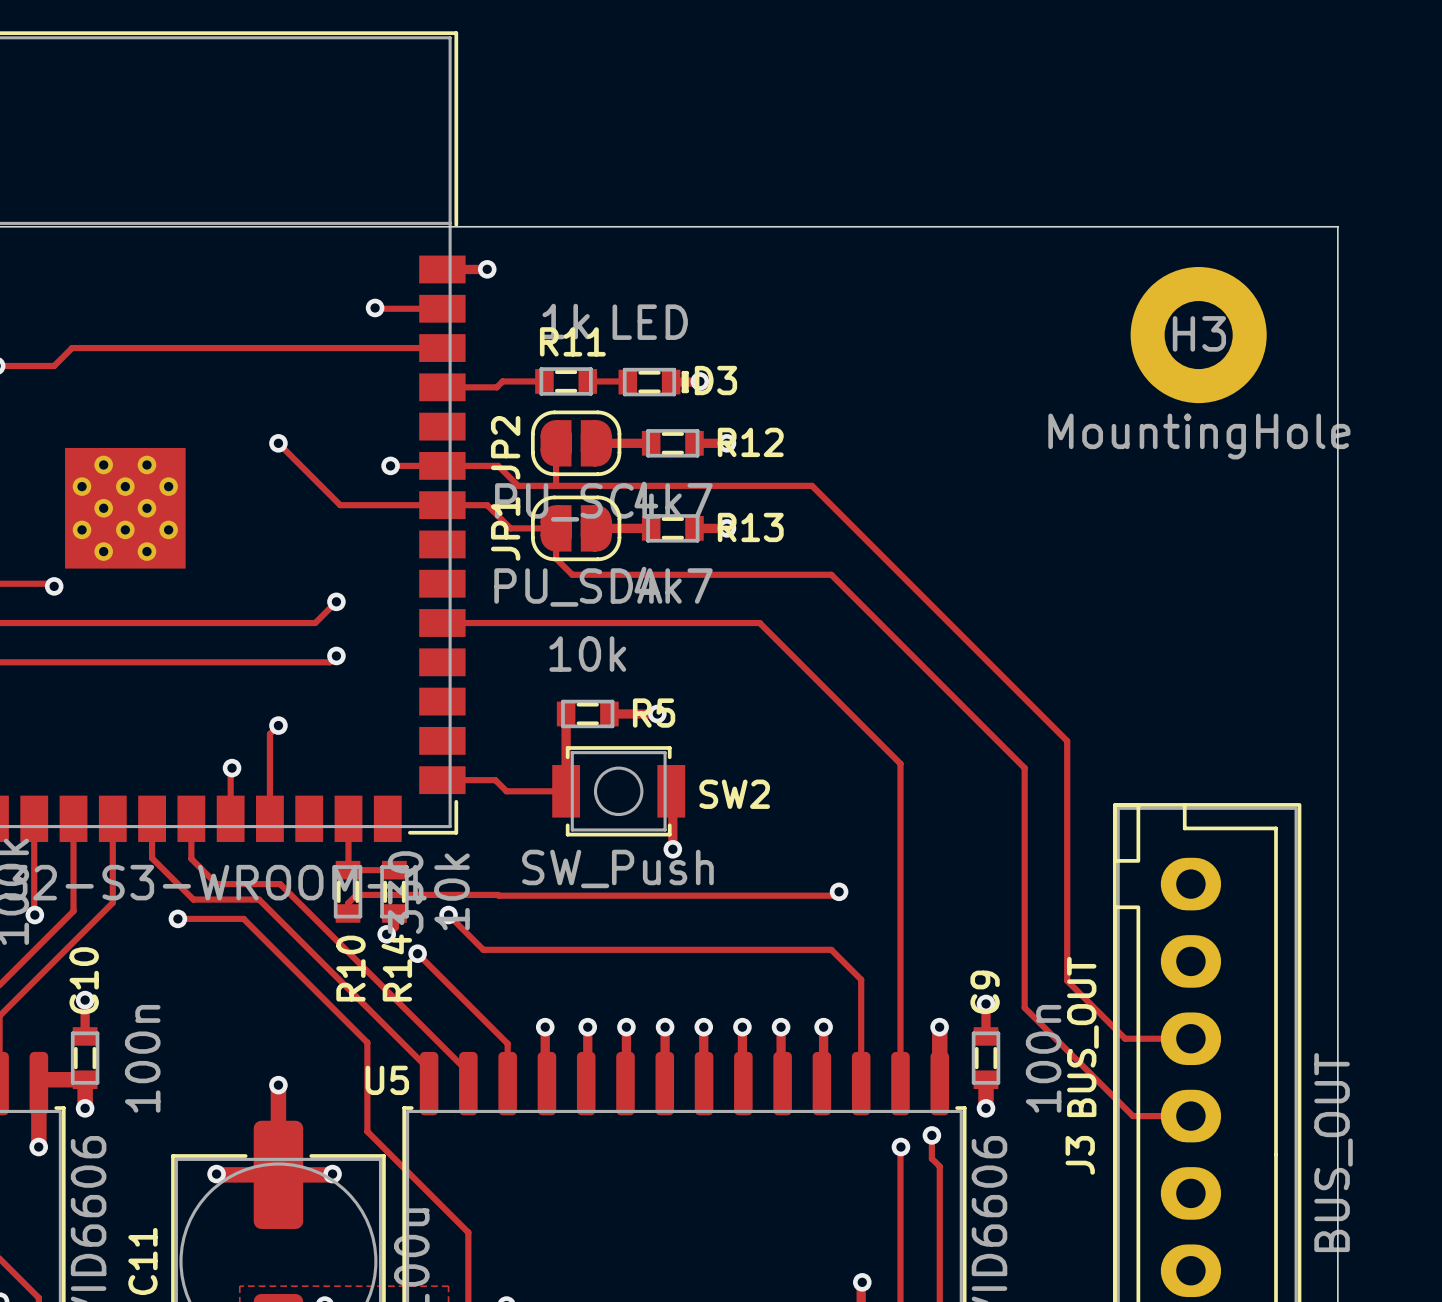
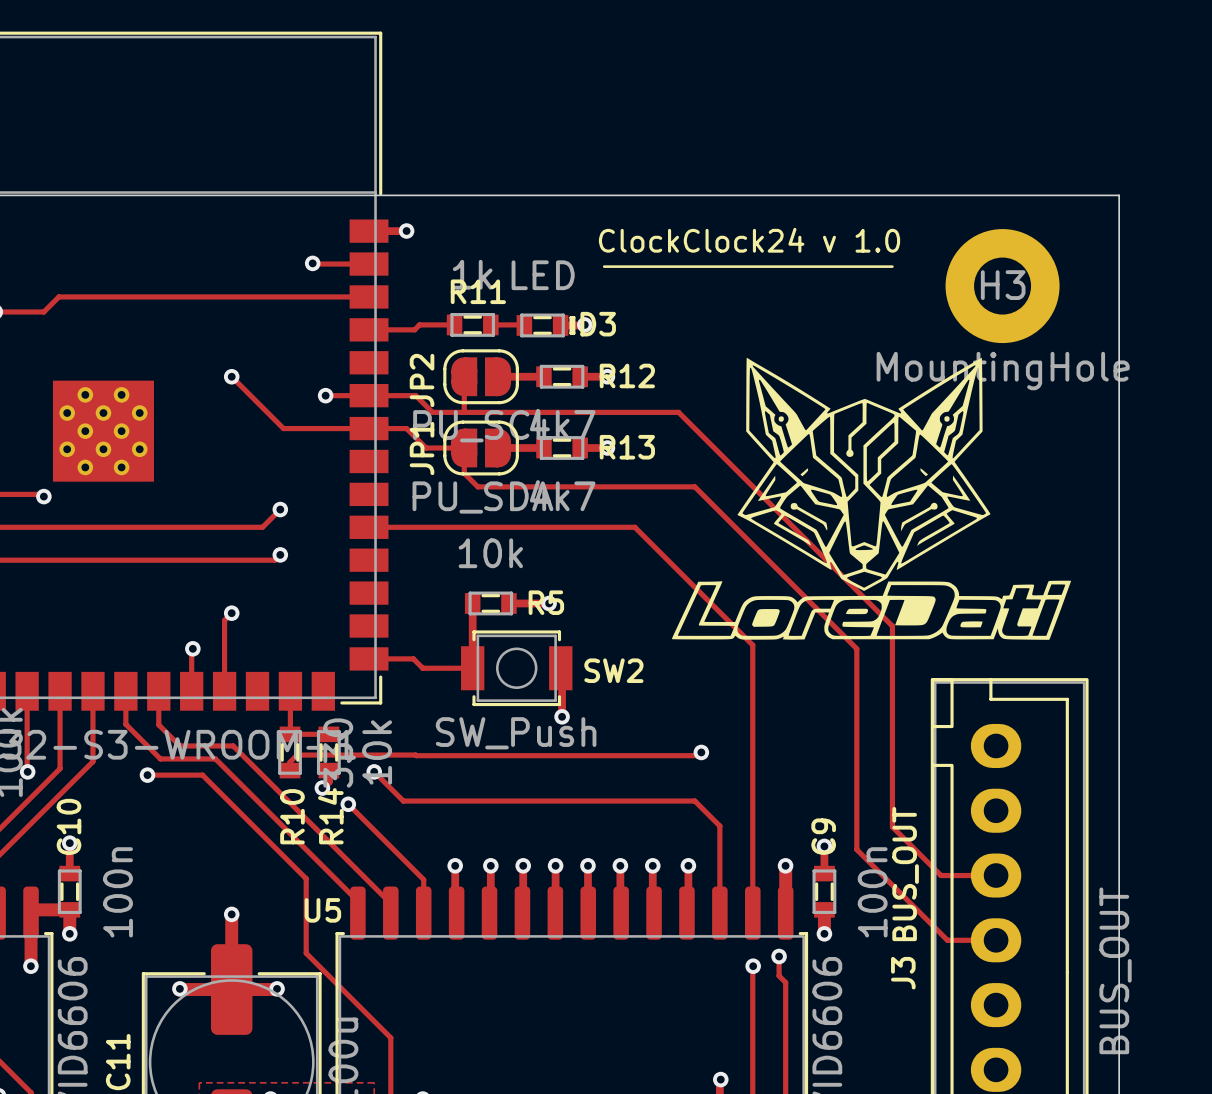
text: none -> ClockClock24 v 1.0 (749, 240)
line: none -> (604, 266) (892, 266)
drawing: none -> [671, 357, 1072, 640]

